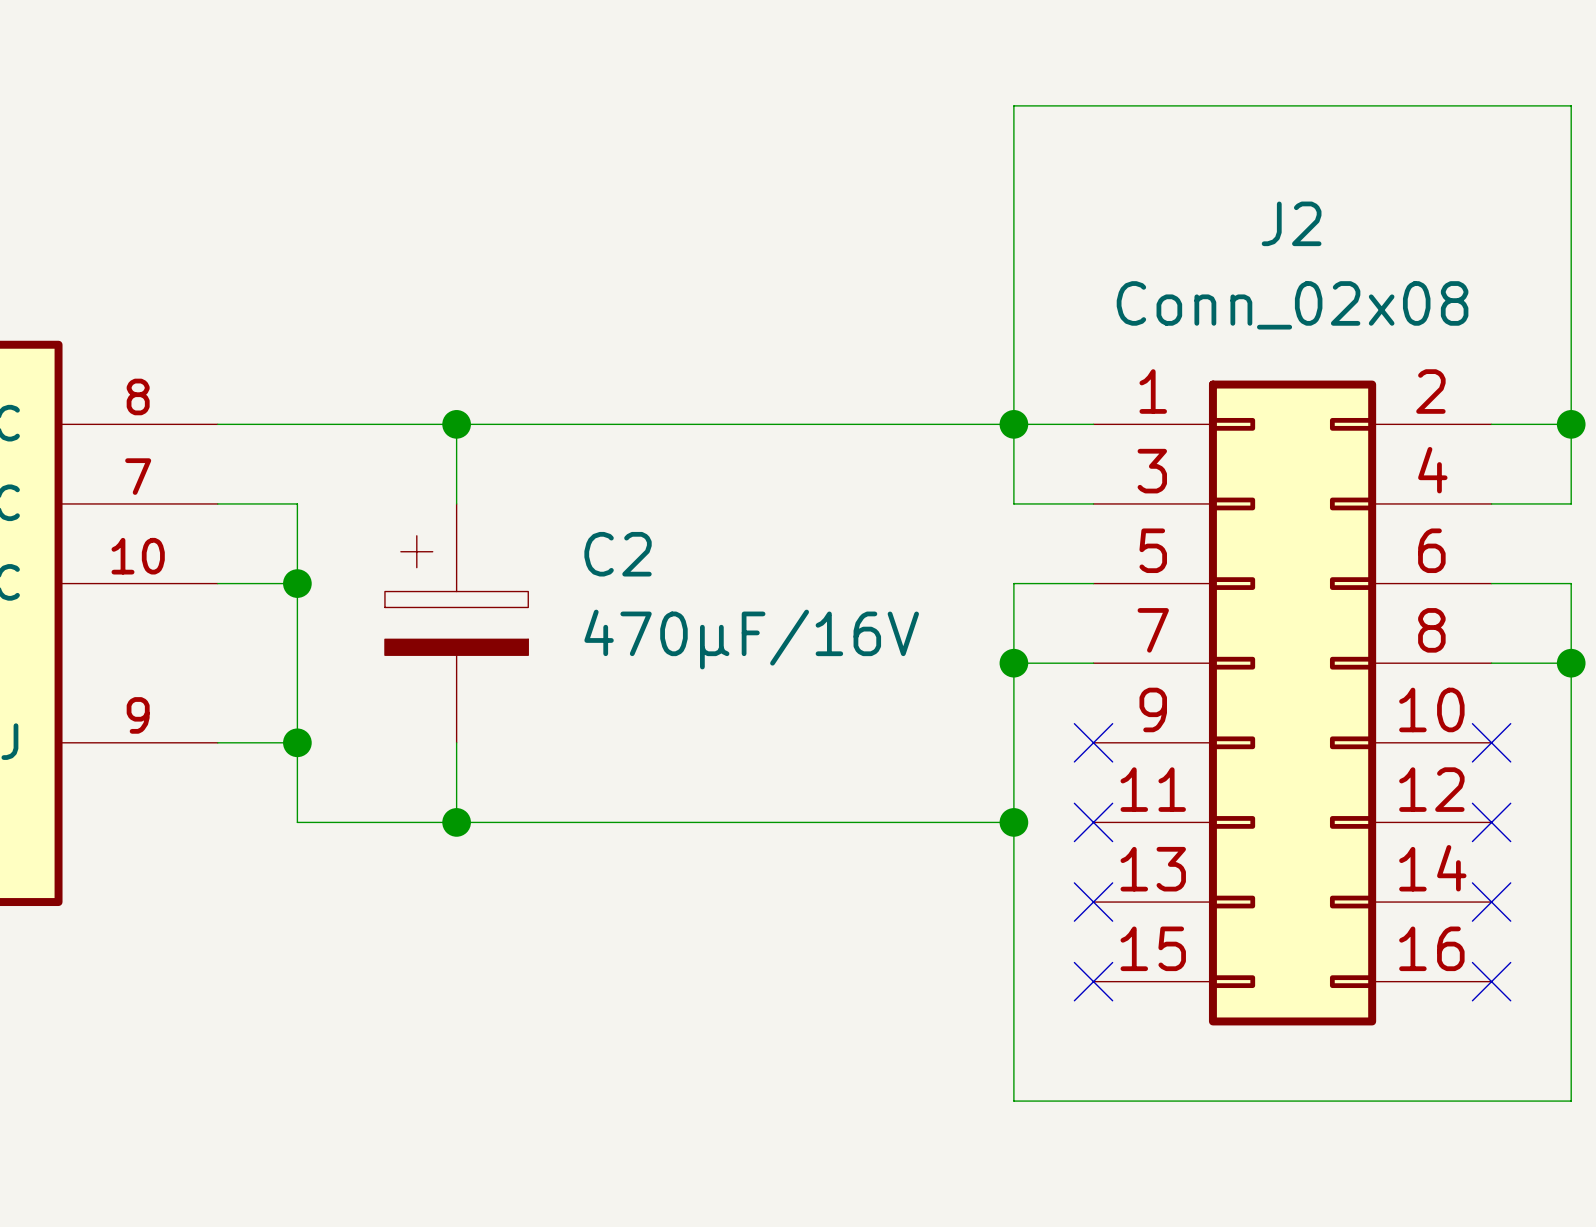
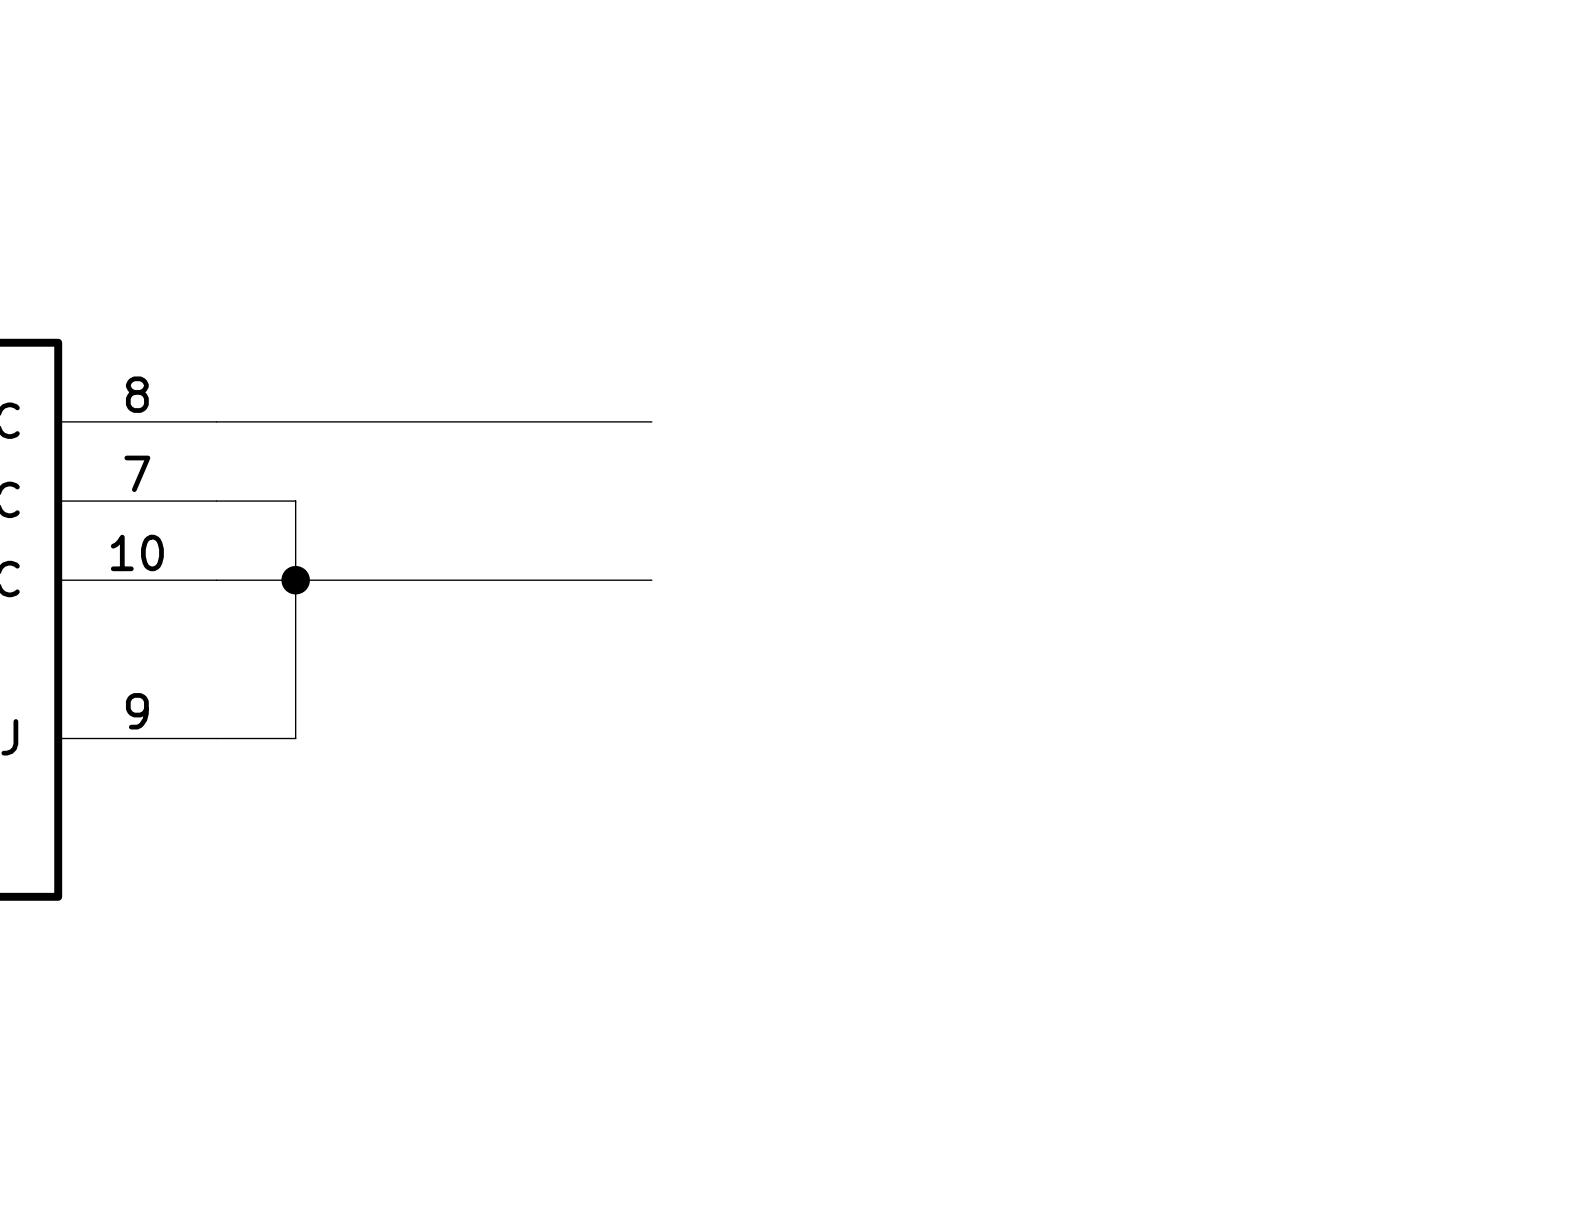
wire: (456, 424) (456, 503) -> none
junction: (456, 424) -> none
wire: (655, 424) (1093, 424) -> none
junction: (1013, 424) -> none
wire: (1491, 424) (1571, 424) -> none
junction: (1571, 424) -> none
wire: (1093, 503) (1013, 503) (1013, 105) (1571, 105) (1571, 503) (1491, 503) -> none
wire: none -> (295, 580) (651, 580)
wire: (1093, 583) (1013, 583) (1013, 1101) (1571, 1101) (1571, 583) (1491, 583) -> none
C2: 470μF/16V (456, 623) -> none
wire: (1013, 663) (1093, 663) -> none
junction: (1013, 663) -> none
wire: (1491, 663) (1571, 663) -> none
junction: (1571, 663) -> none
J2: Conn_02x08 (1292, 703) -> none
wire: (297, 742) (297, 822) (1013, 822) -> none
junction: (297, 742) -> none
wire: (456, 742) (456, 822) -> none
no-connect mark: (1093, 742) -> none
no-connect mark: (1491, 742) -> none
junction: (456, 822) -> none
junction: (1013, 822) -> none
no-connect mark: (1093, 822) -> none
no-connect mark: (1491, 822) -> none
no-connect mark: (1093, 902) -> none
no-connect mark: (1491, 902) -> none
no-connect mark: (1093, 981) -> none
no-connect mark: (1491, 981) -> none

